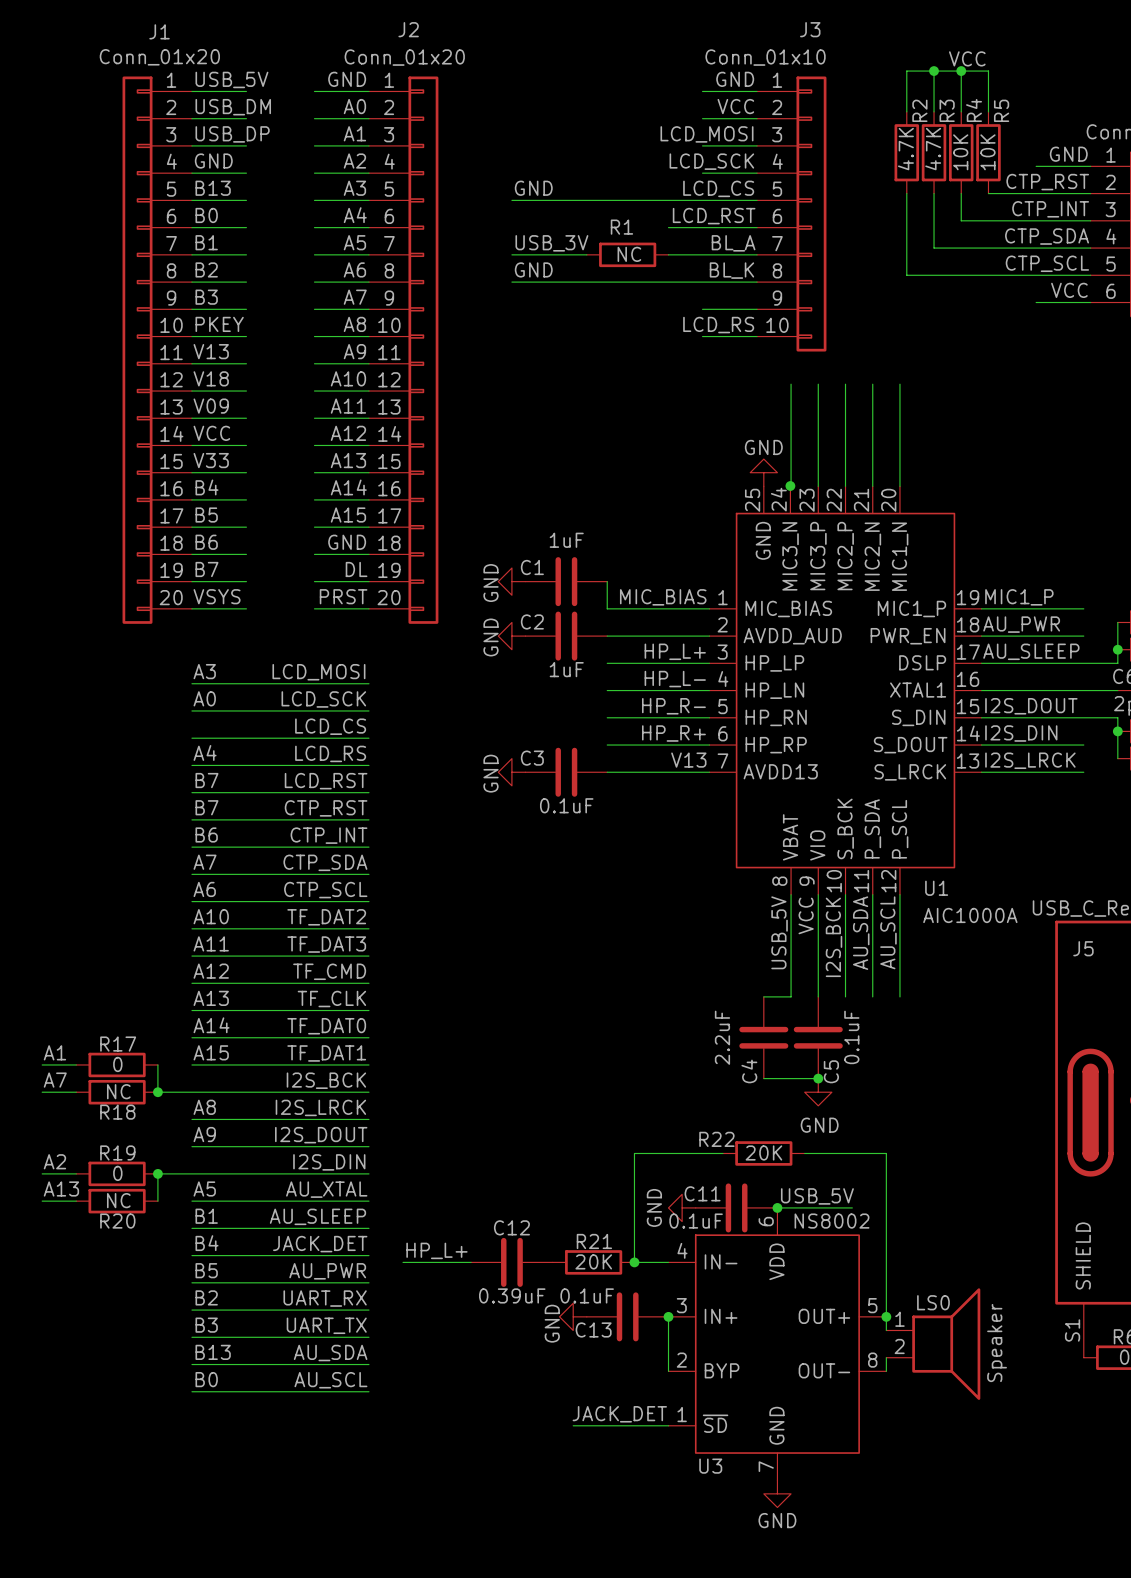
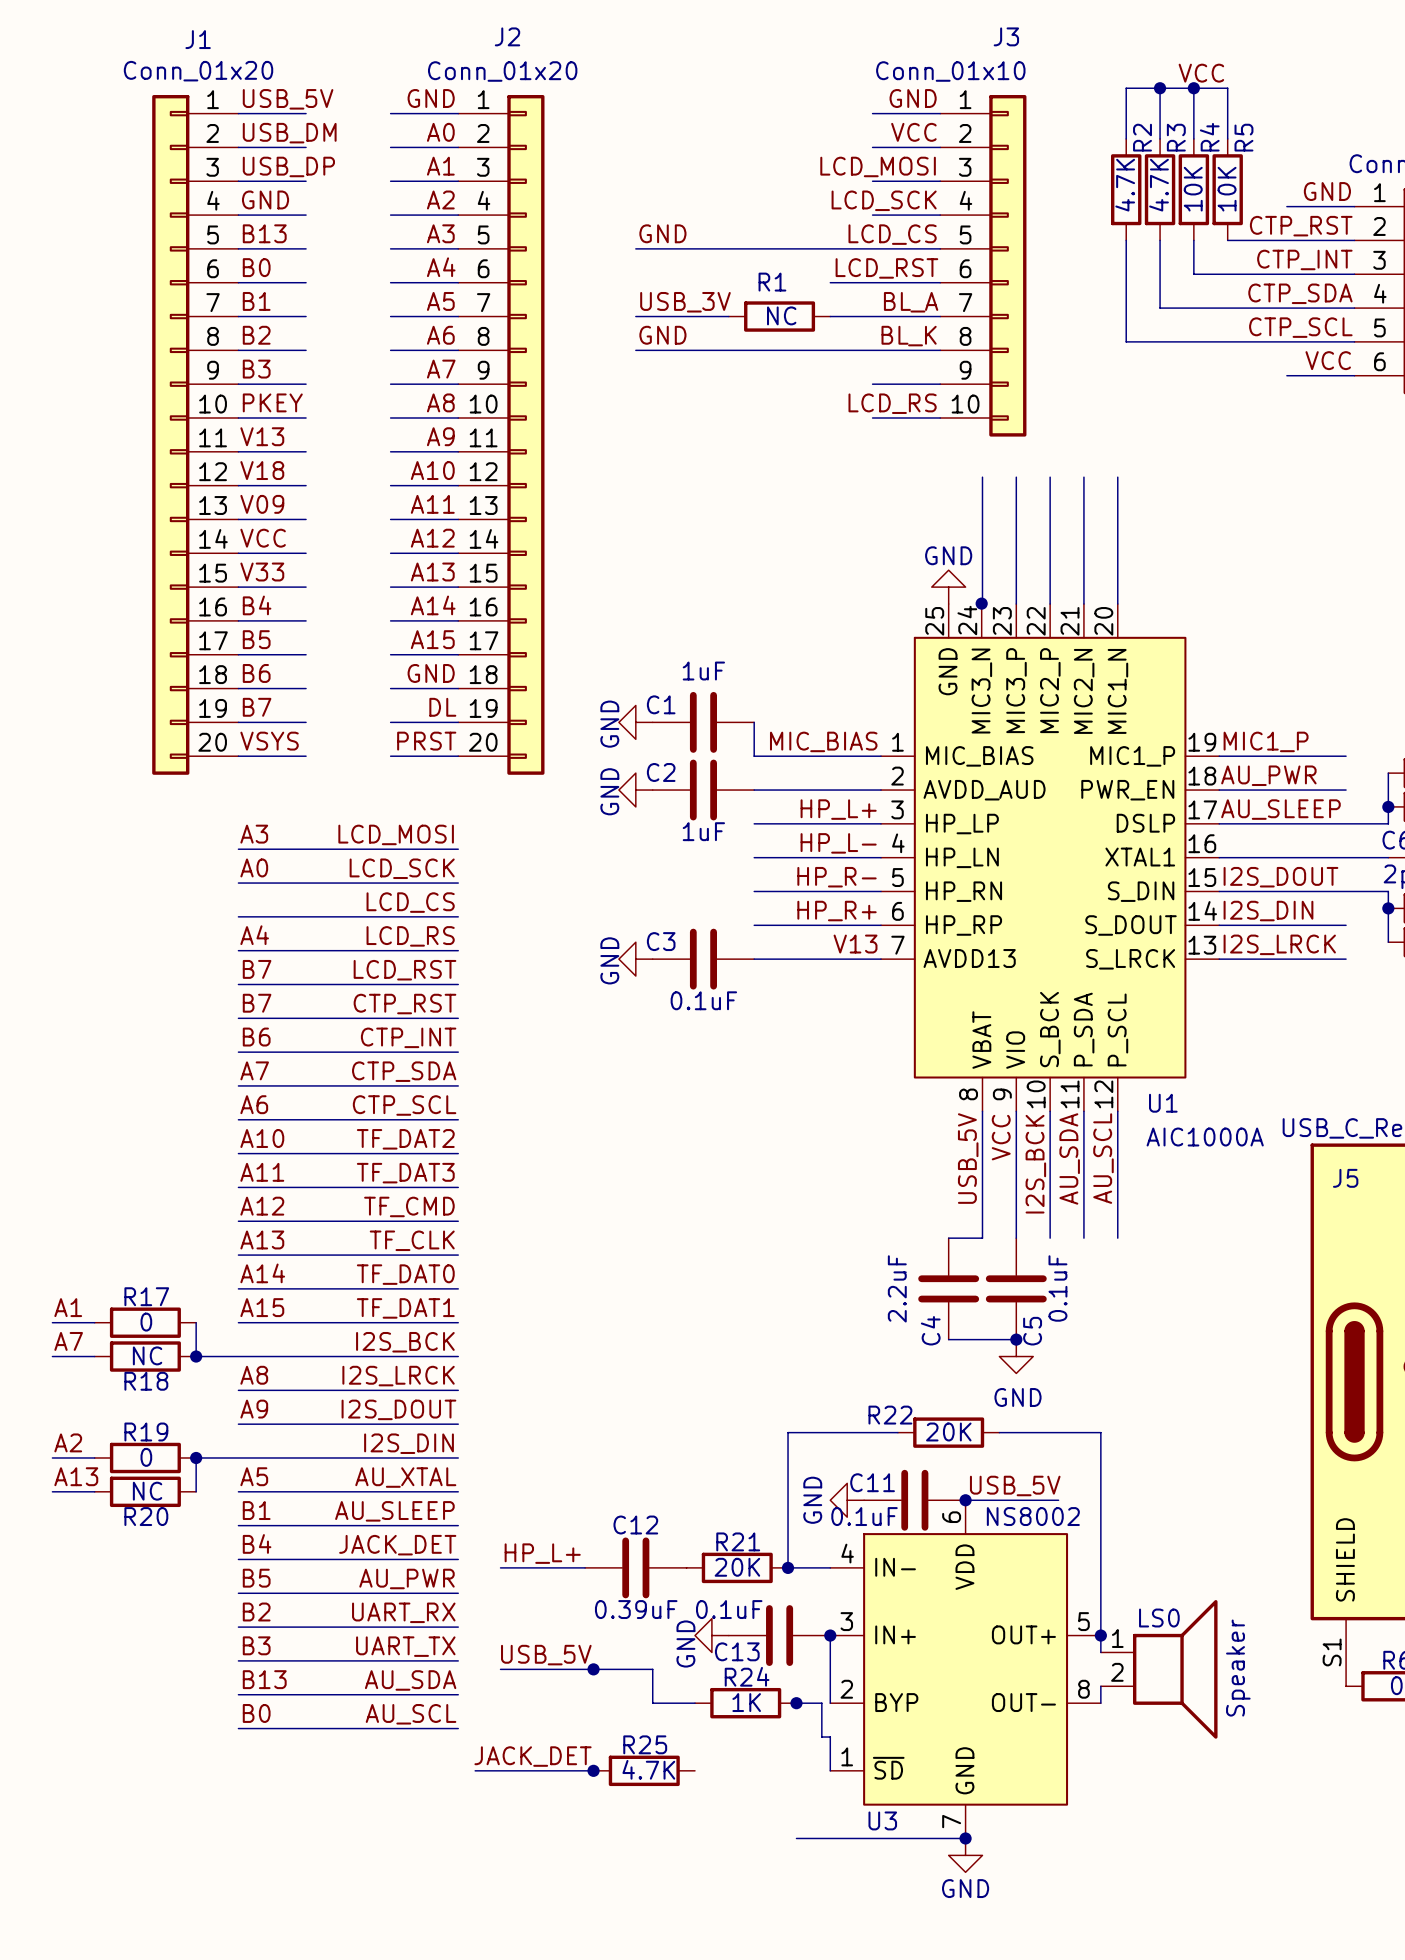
label: none -> USB_5V (546, 1655)
wire: none -> (500, 1669) (652, 1669) (652, 1703) (695, 1703)
junction: none -> (593, 1669)
R24: none -> 1K (745, 1703)
junction: none -> (796, 1703)
label position: JACK_DET (619, 1414) -> JACK_DET (533, 1756)
wire: none -> (475, 1770) (593, 1770)
junction: none -> (593, 1770)
R25: none -> 4.7K (644, 1770)
wire: (573, 1425) (668, 1425) -> (796, 1703) (821, 1703) (821, 1737) (830, 1737) (830, 1770)
wire: none -> (796, 1838) (965, 1838)
junction: none -> (965, 1838)

